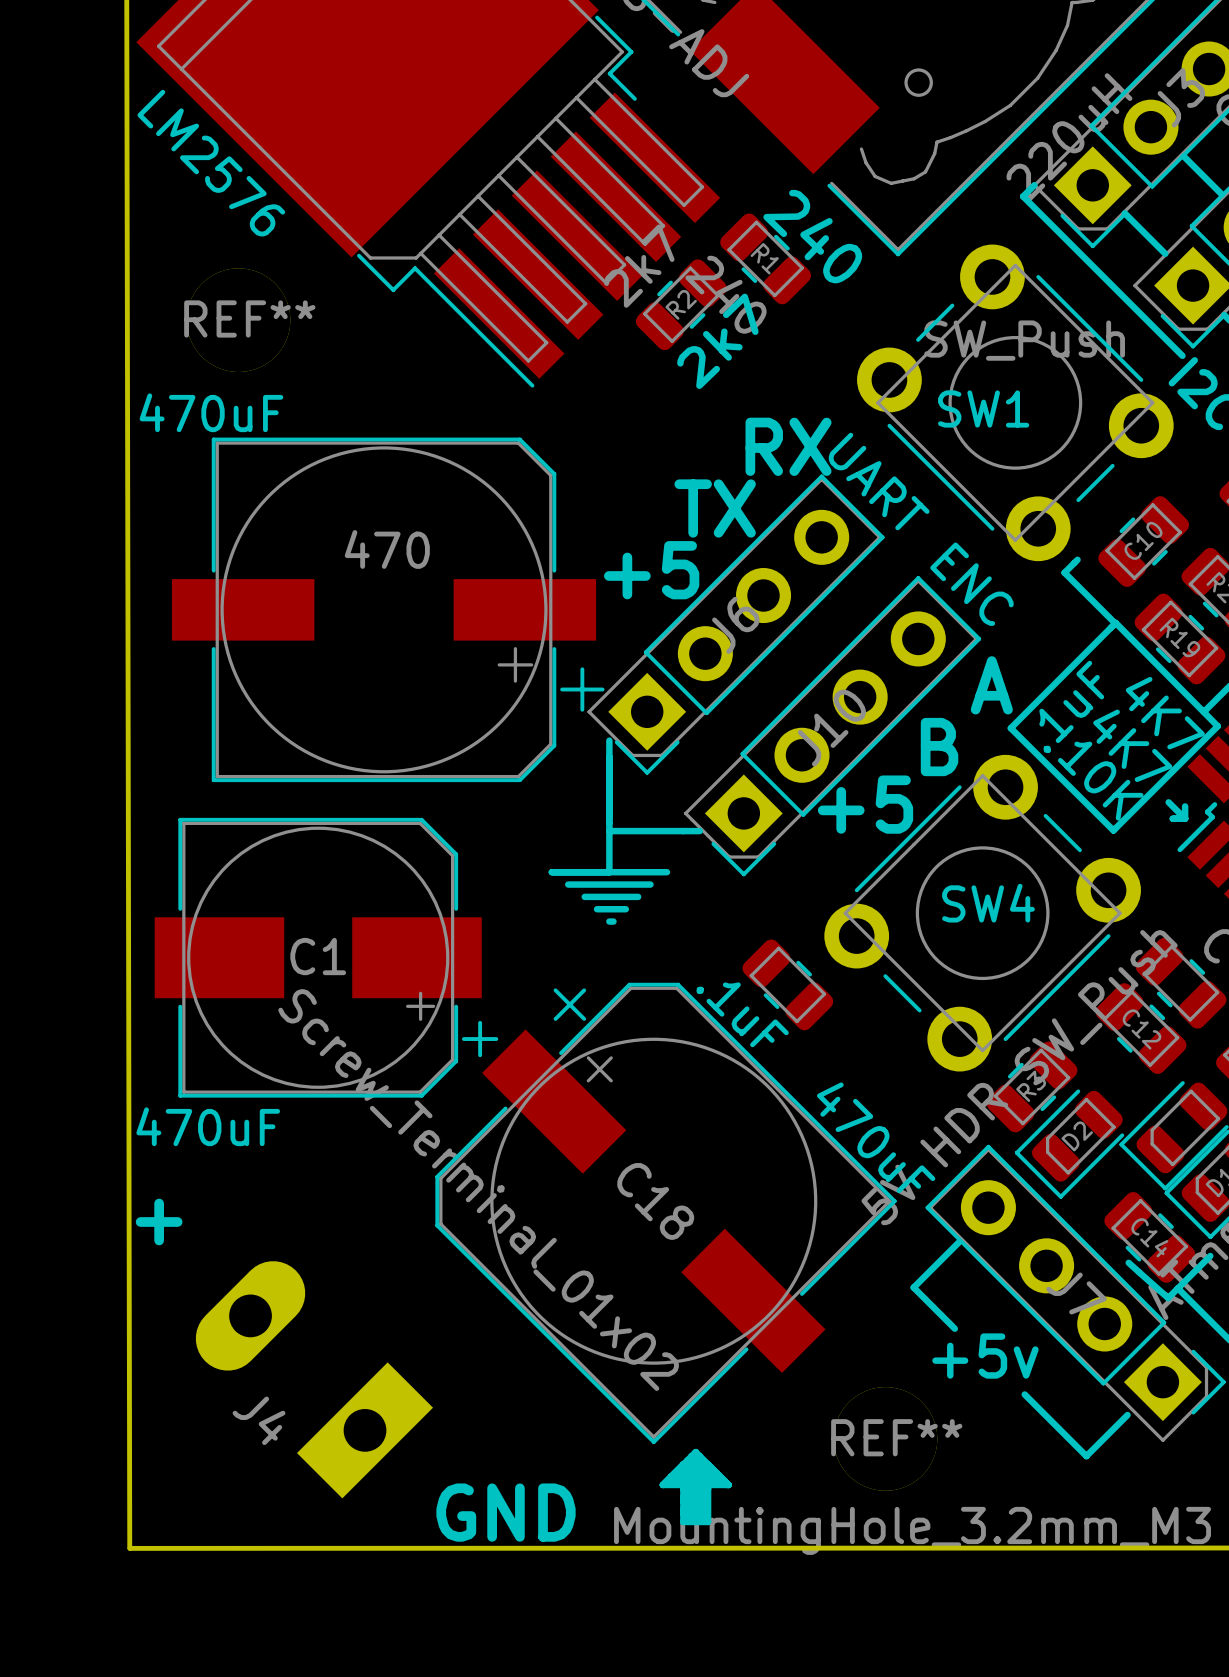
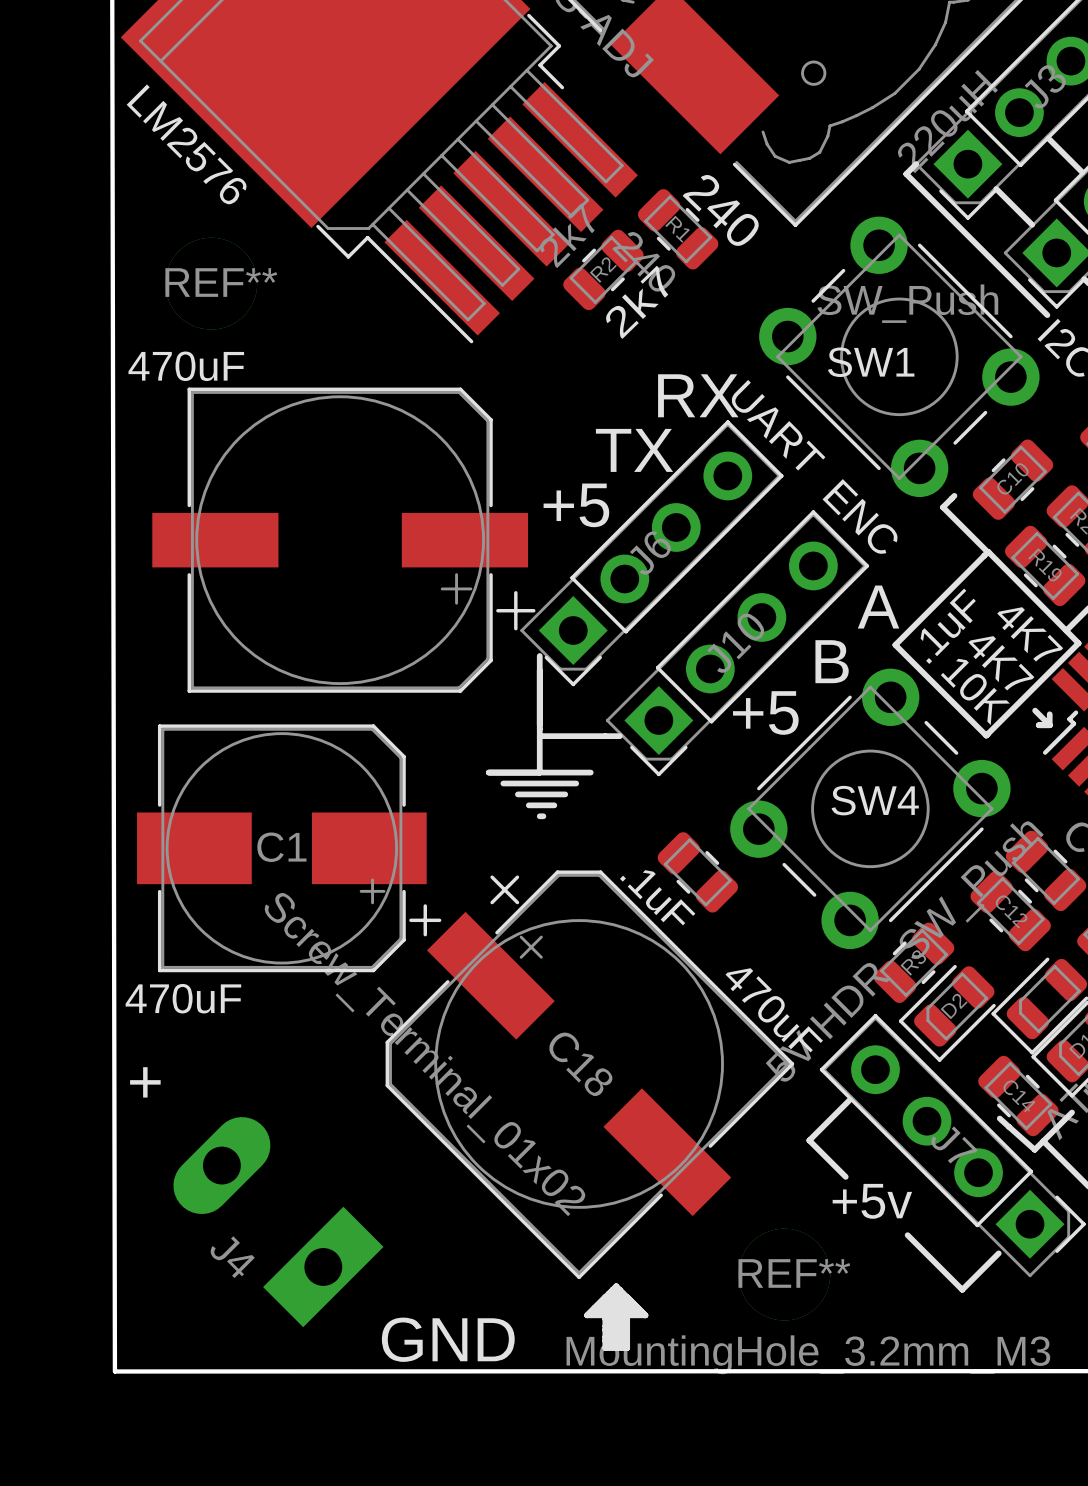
470uF value: 470 (387, 549) -> none

